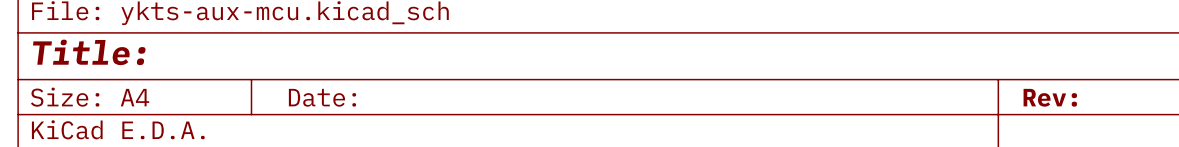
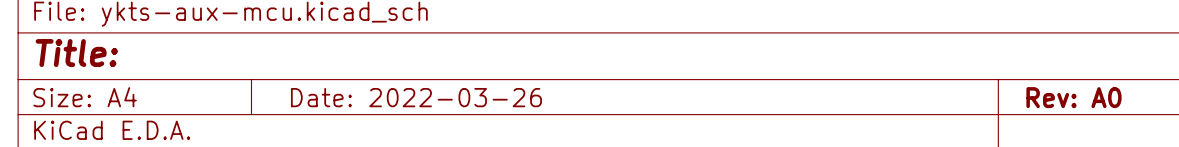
title block: Date: (322, 97) -> Date: 2022-03-26 (416, 97)
title block: Rev: (1050, 97) -> Rev: A0 (1073, 97)

